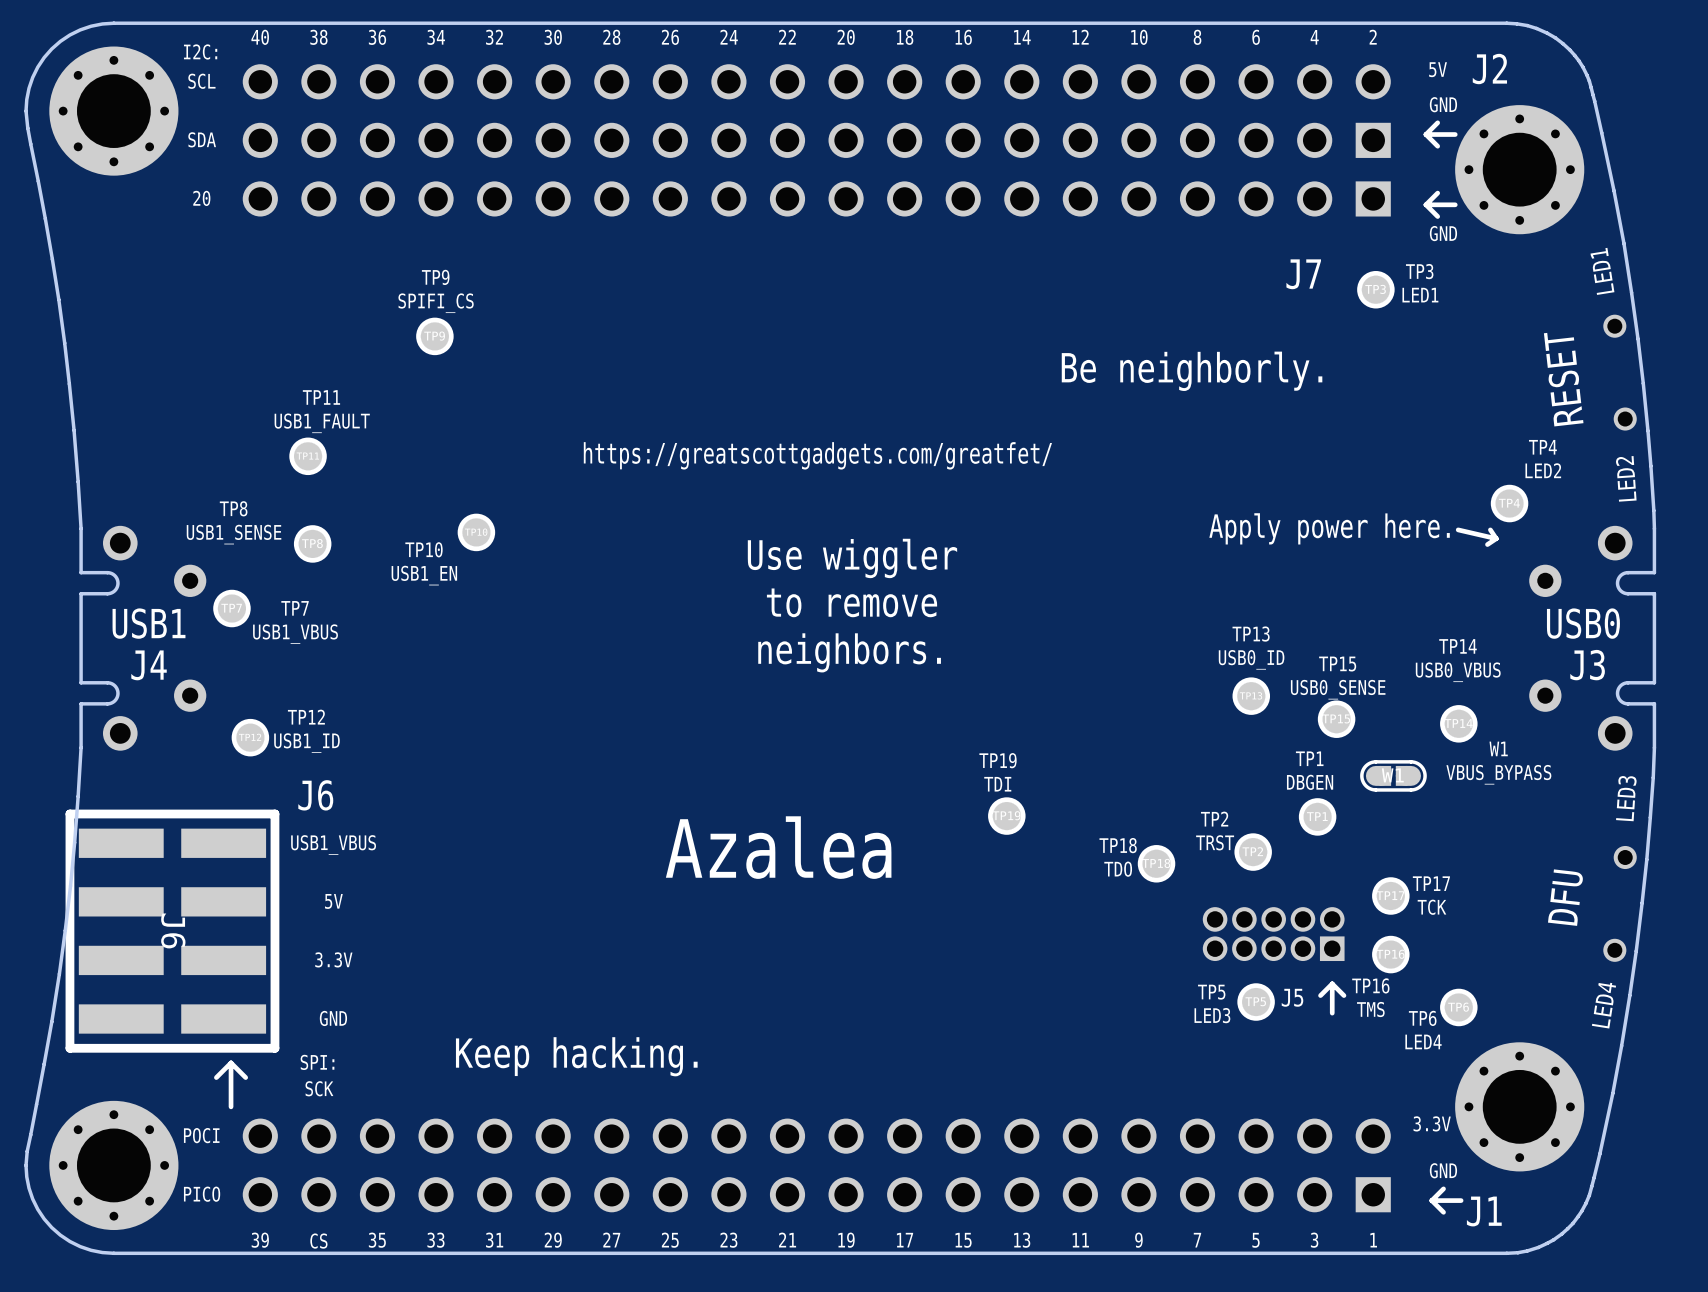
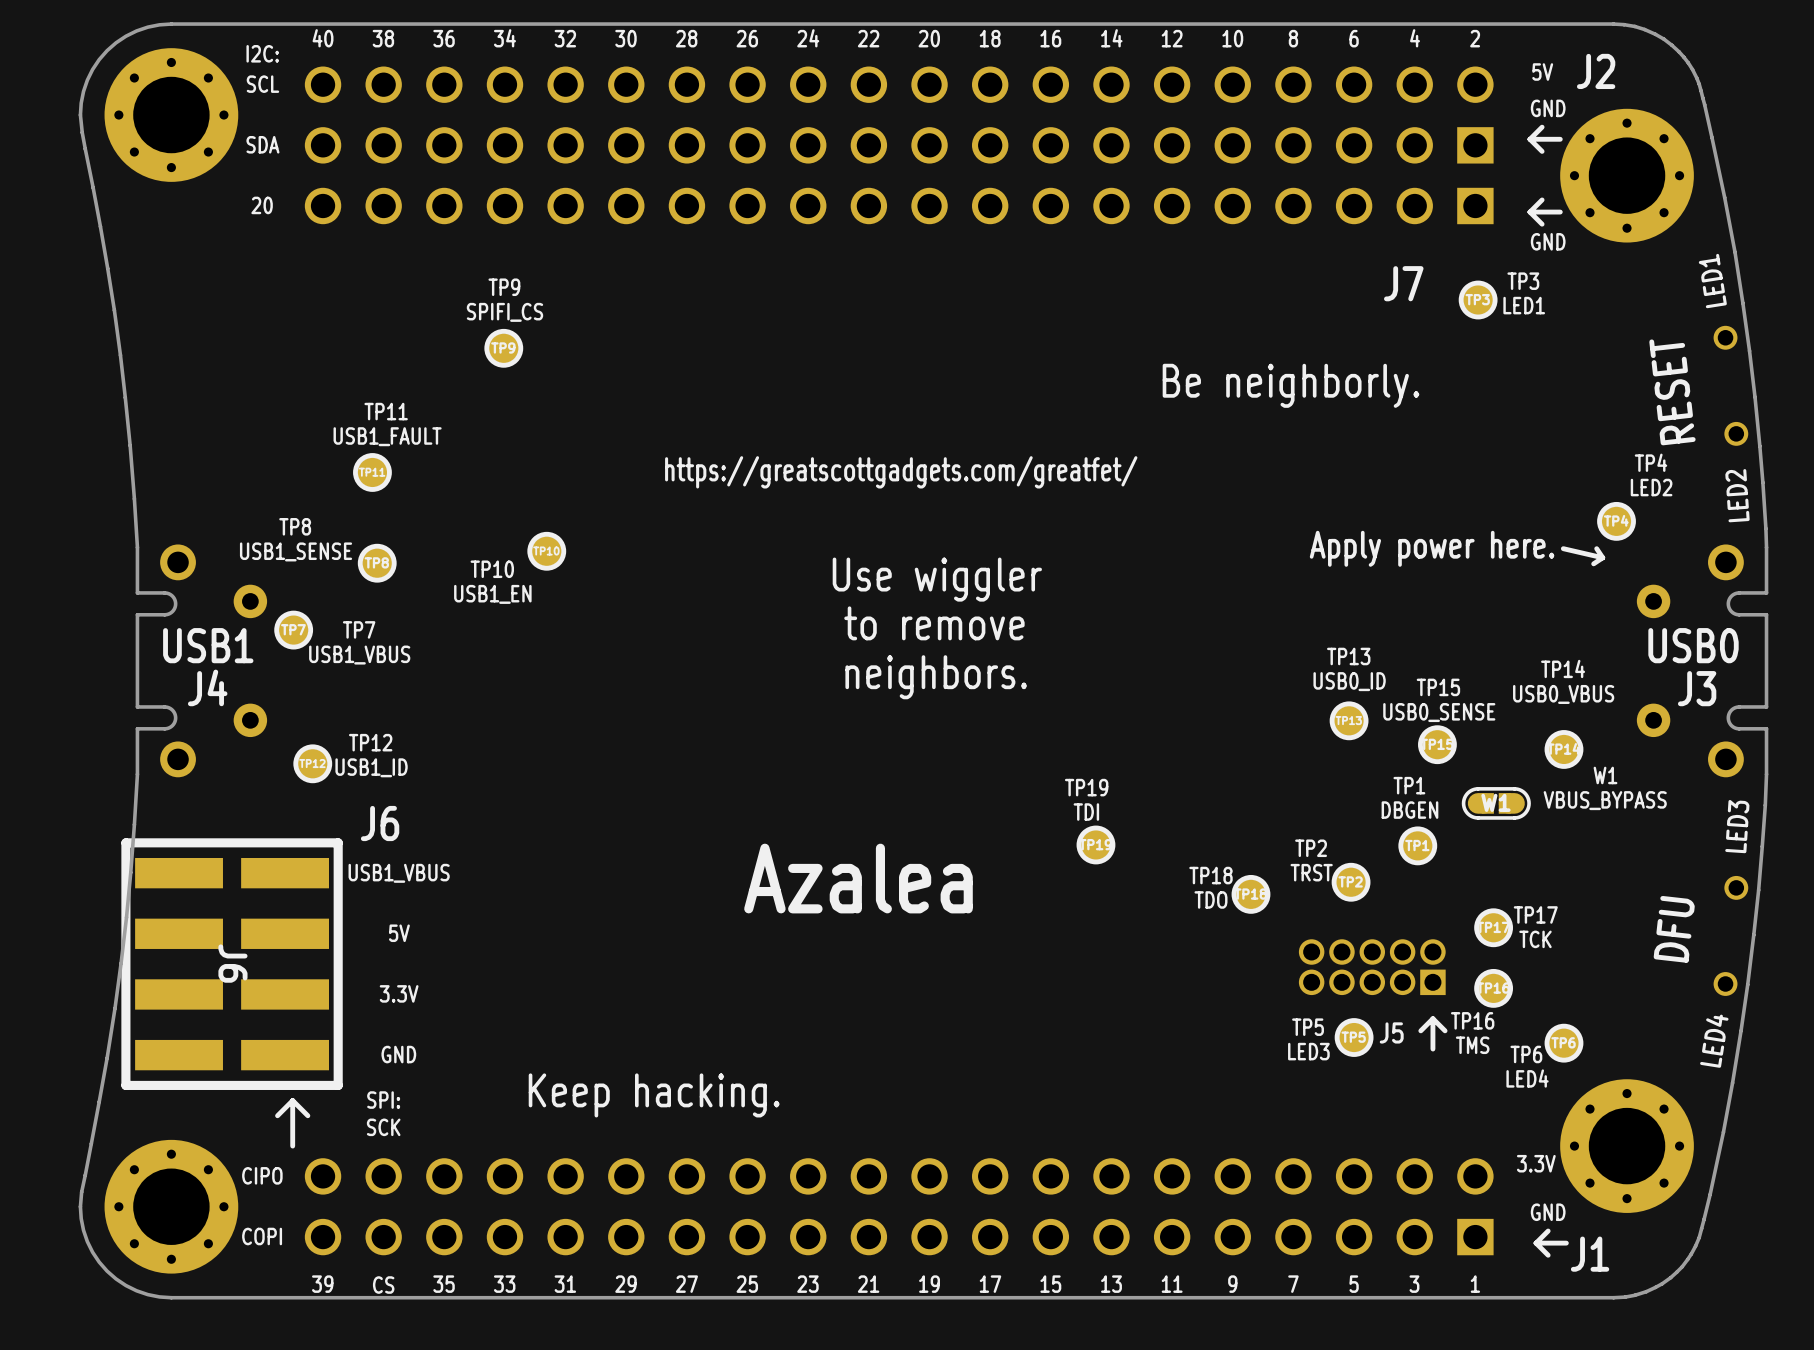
text: POCI (201, 1135) -> CIPO (262, 1175)
text: PICO (202, 1194) -> COPI (262, 1236)

